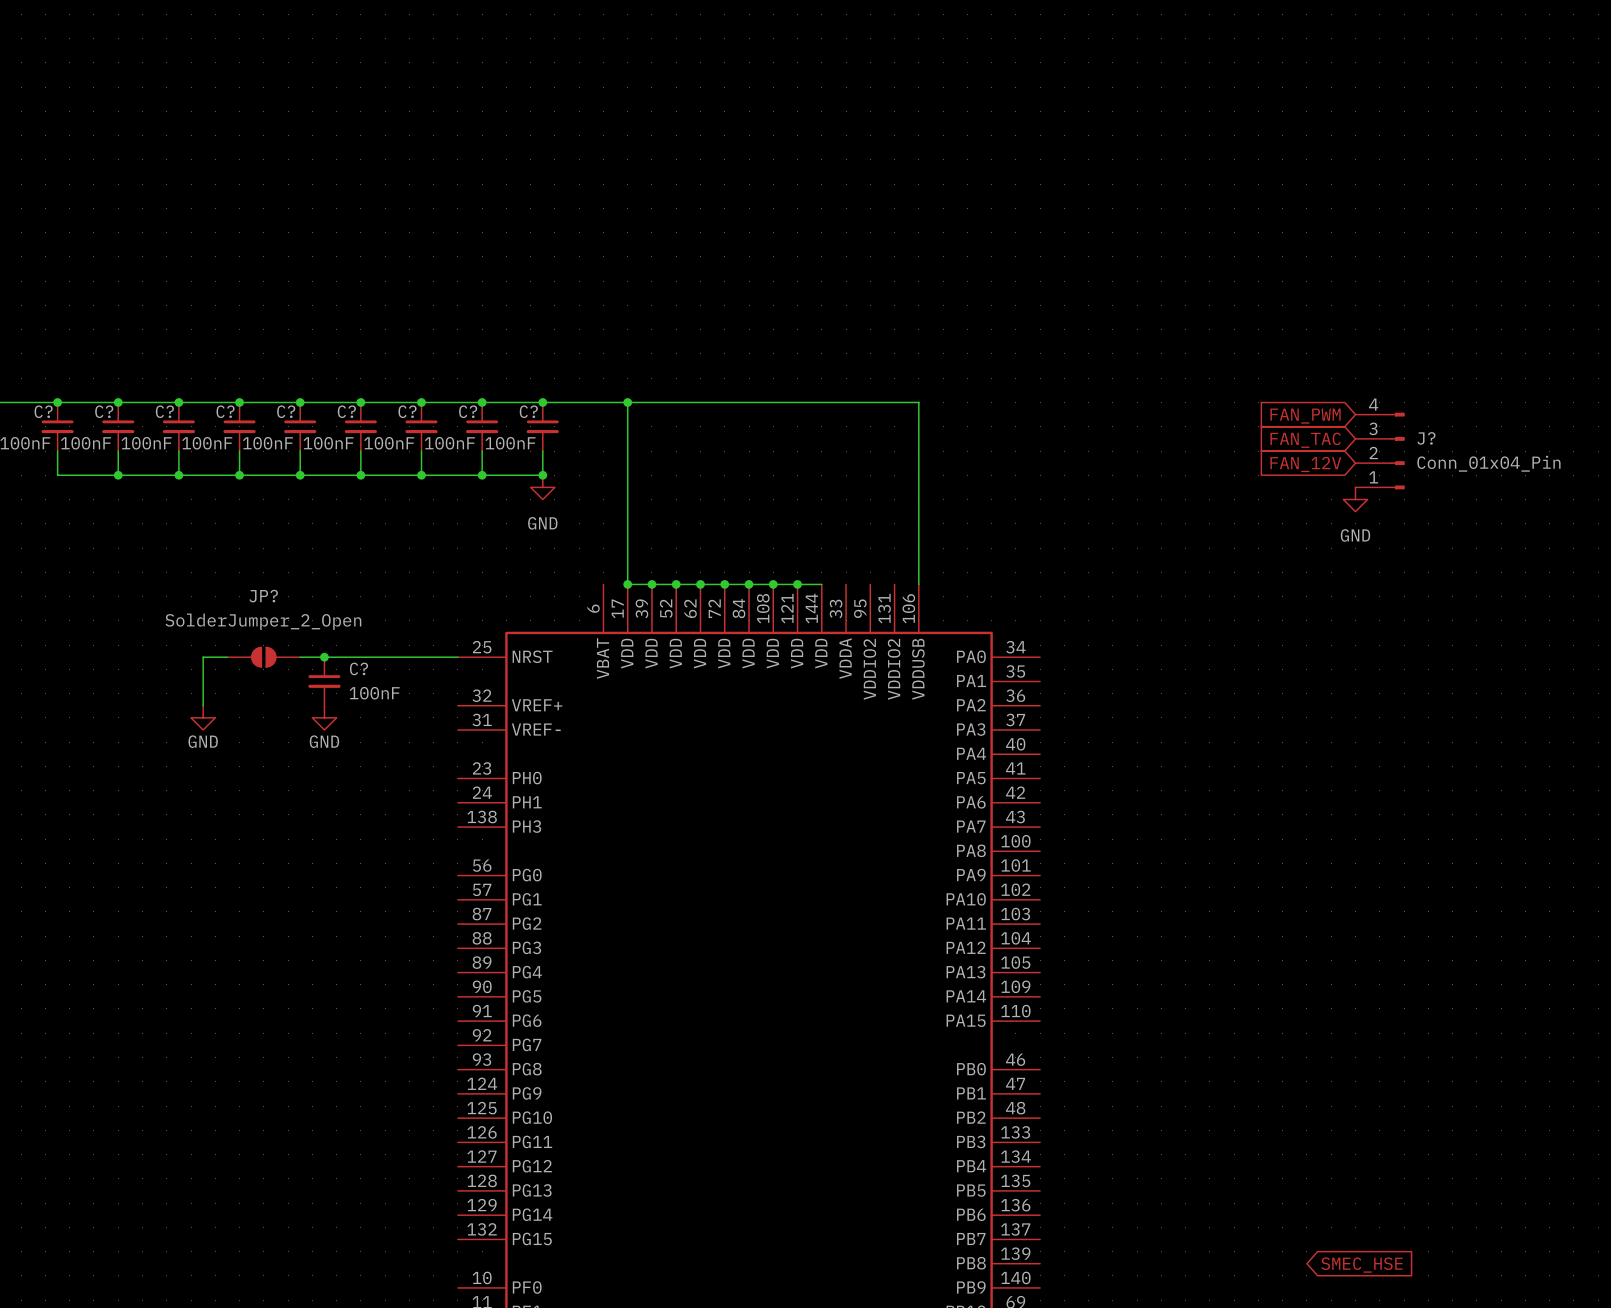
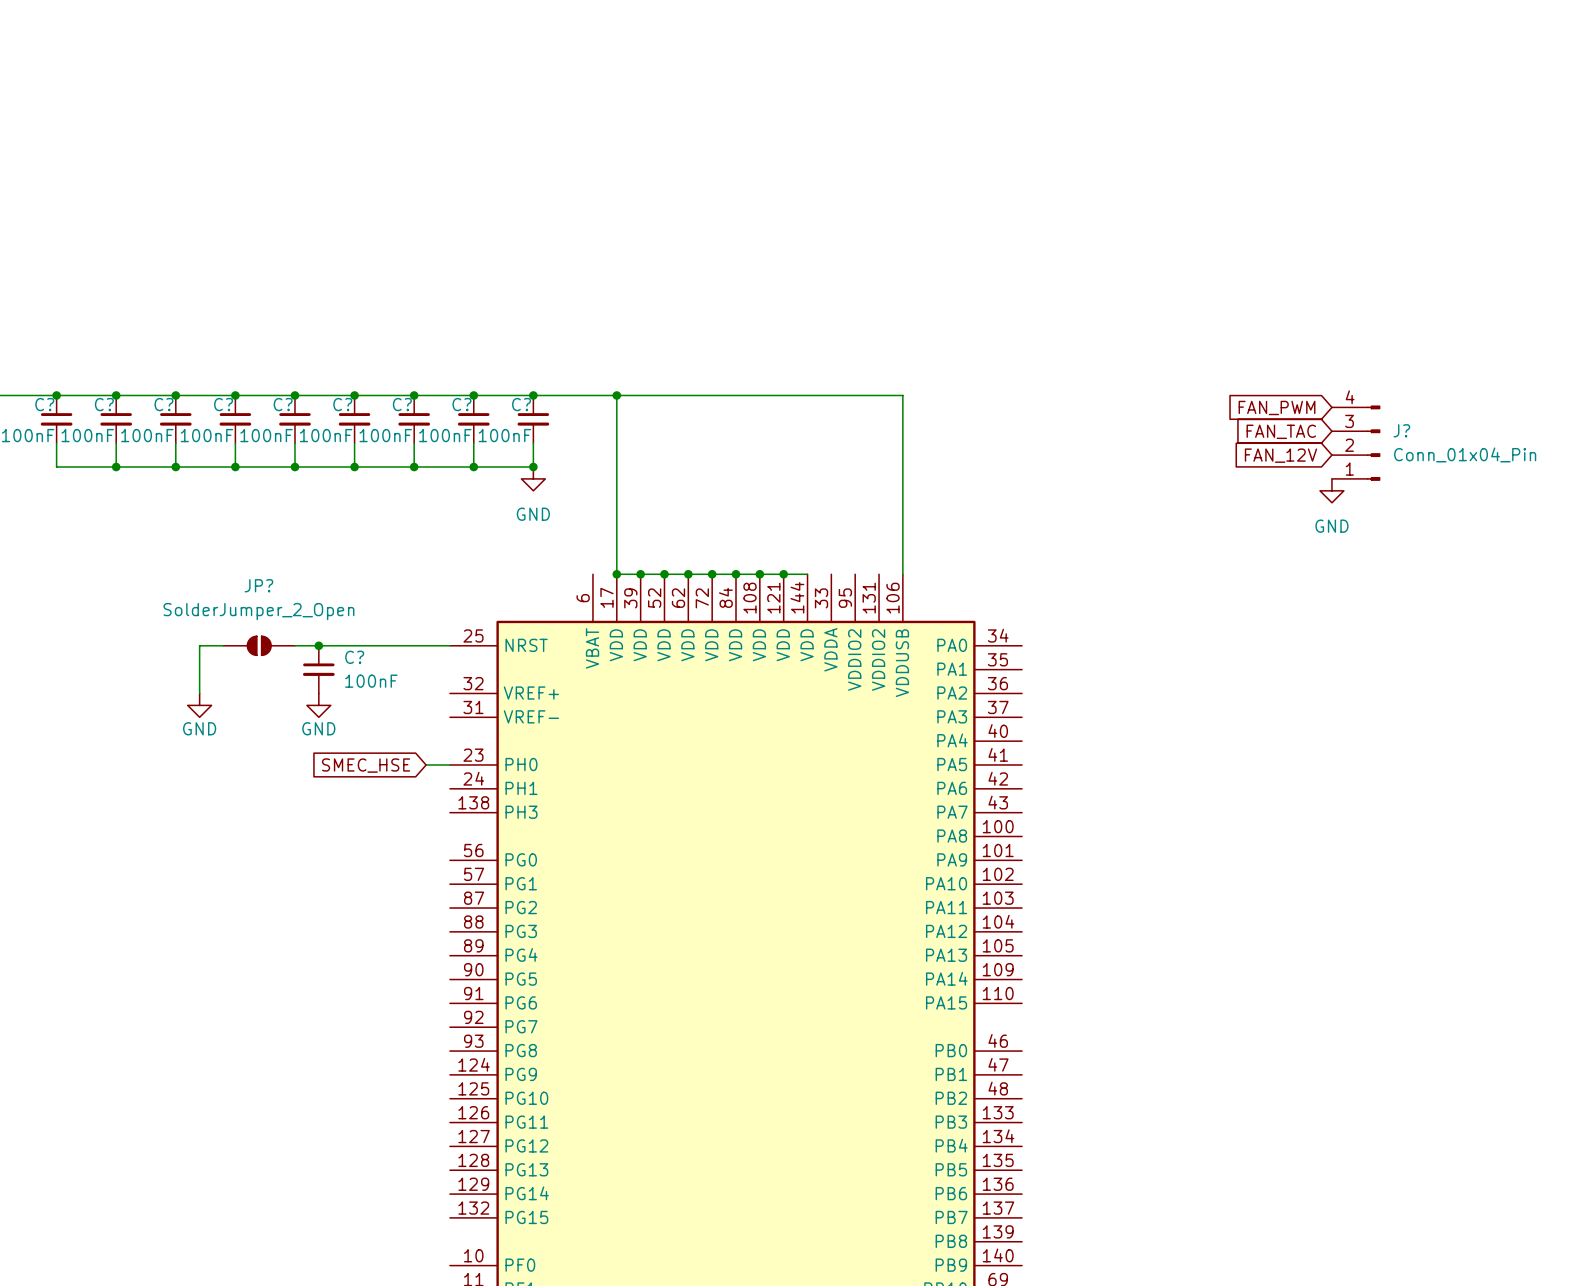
wire: none -> (426, 764) (449, 764)
global label: none -> SMEC_HSE (366, 765)
global label: SMEC_HSE (1362, 1265) -> none

